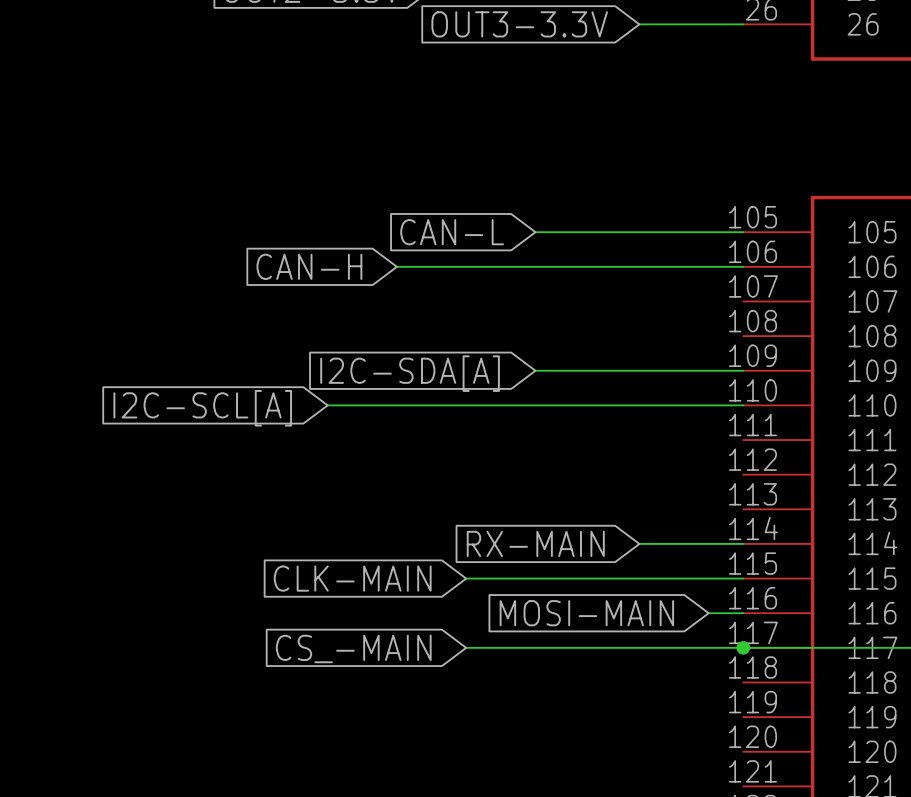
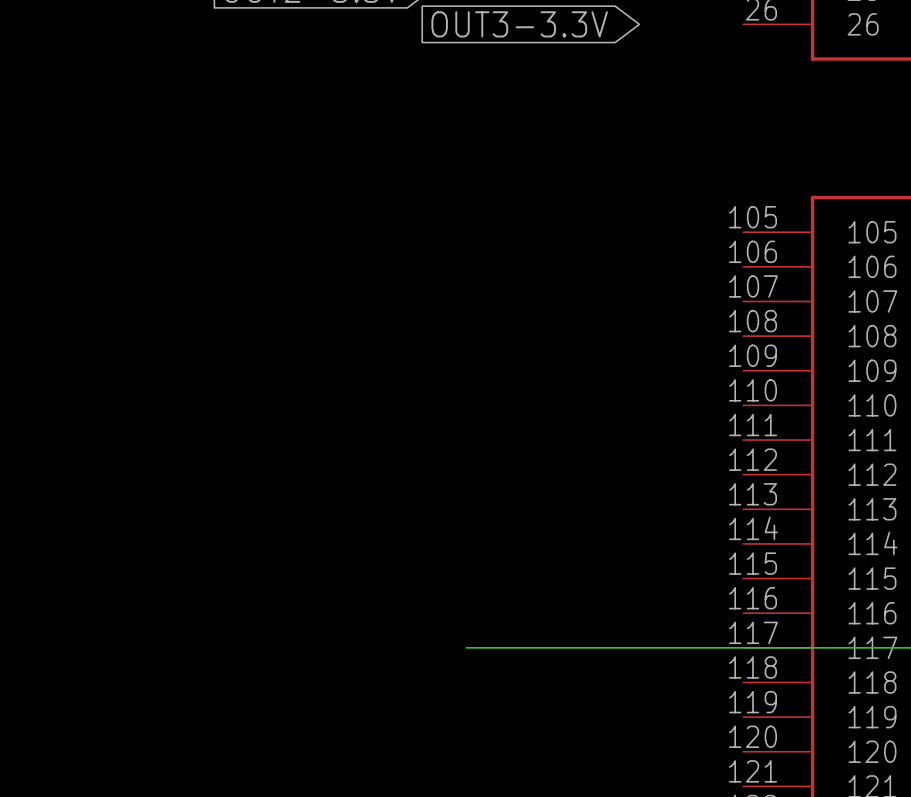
wire: (639, 24) (743, 24) -> none
global label: CAN-L (452, 232) -> none
wire: (535, 232) (743, 232) -> none
global label: CAN-H (309, 266) -> none
wire: (396, 266) (743, 266) -> none
wire: (535, 370) (743, 370) -> none
global label: I2C-SDA[A] (410, 373) -> none
wire: (327, 405) (743, 405) -> none
global label: I2C-SCL[A] (202, 408) -> none
global label: RX-MAIN (535, 543) -> none
wire: (639, 543) (743, 543) -> none
global label: CLK-MAIN (352, 578) -> none
wire: (466, 578) (743, 578) -> none
global label: MOSI-MAIN (586, 613) -> none
wire: (708, 613) (743, 613) -> none
junction: (743, 647) -> none
global label: CS_-MAIN (353, 649) -> none

